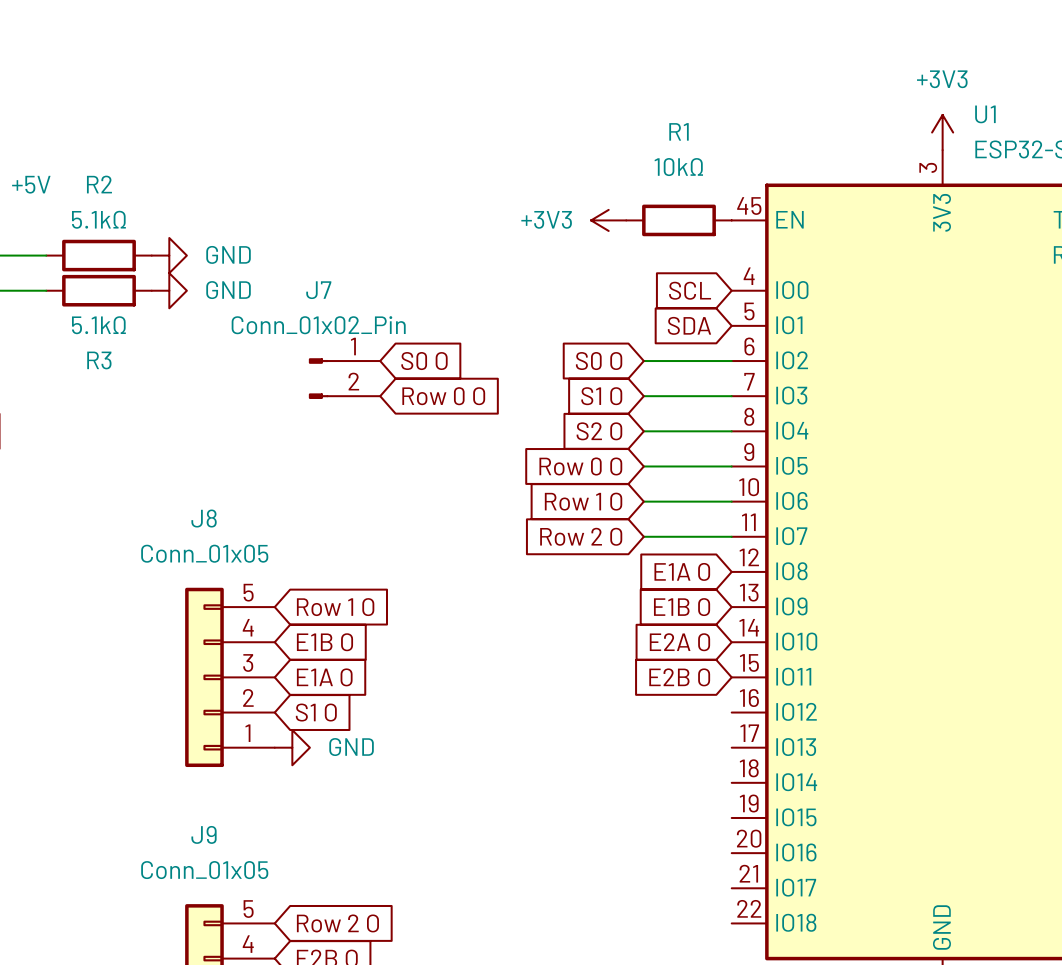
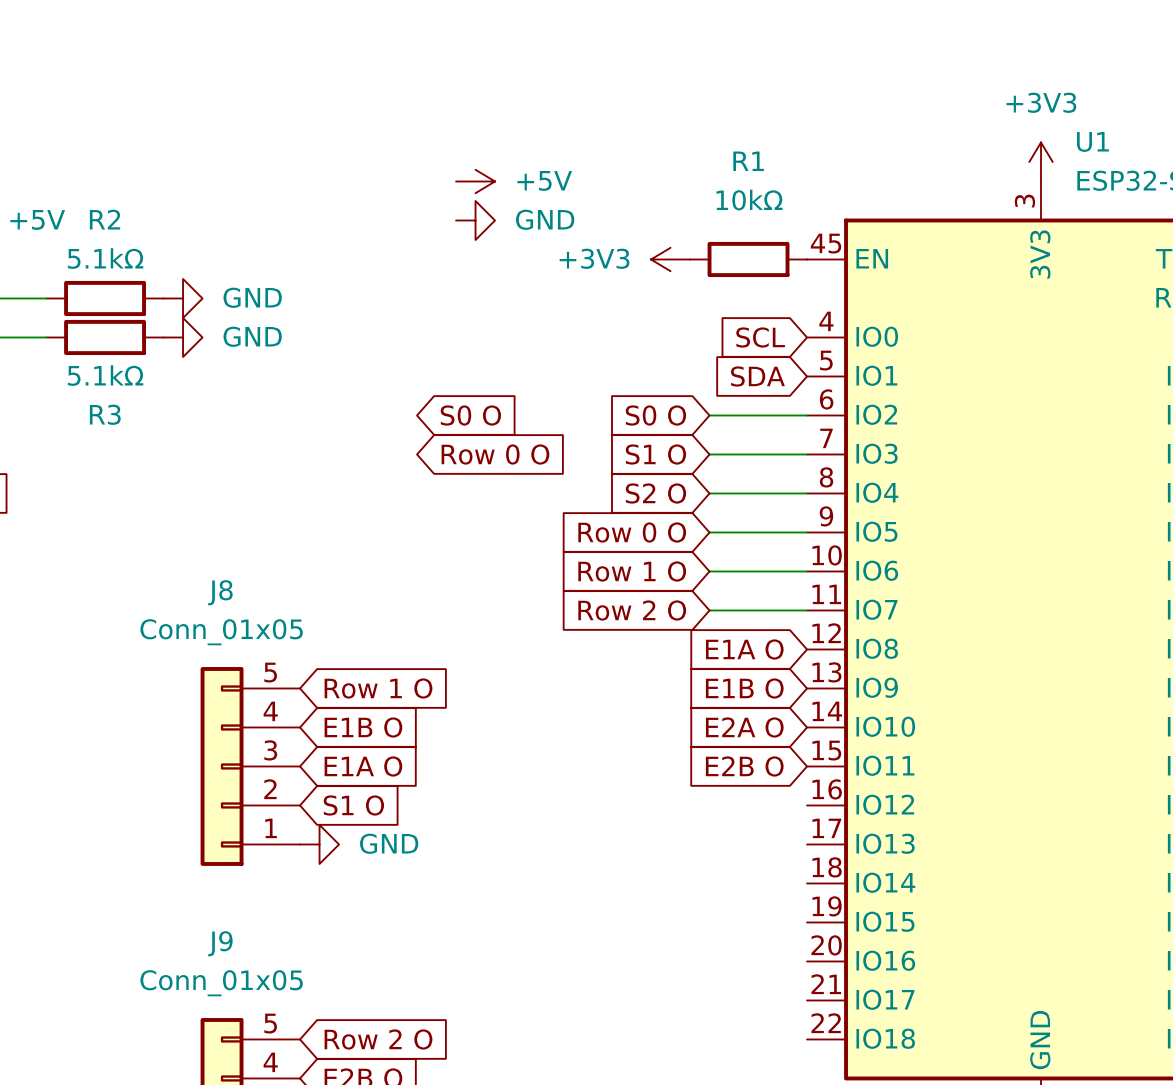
power symbol: none -> +5V (475, 181)
power symbol: none -> GND (475, 220)
J7: Conn_01x02_Pin (344, 378) -> none

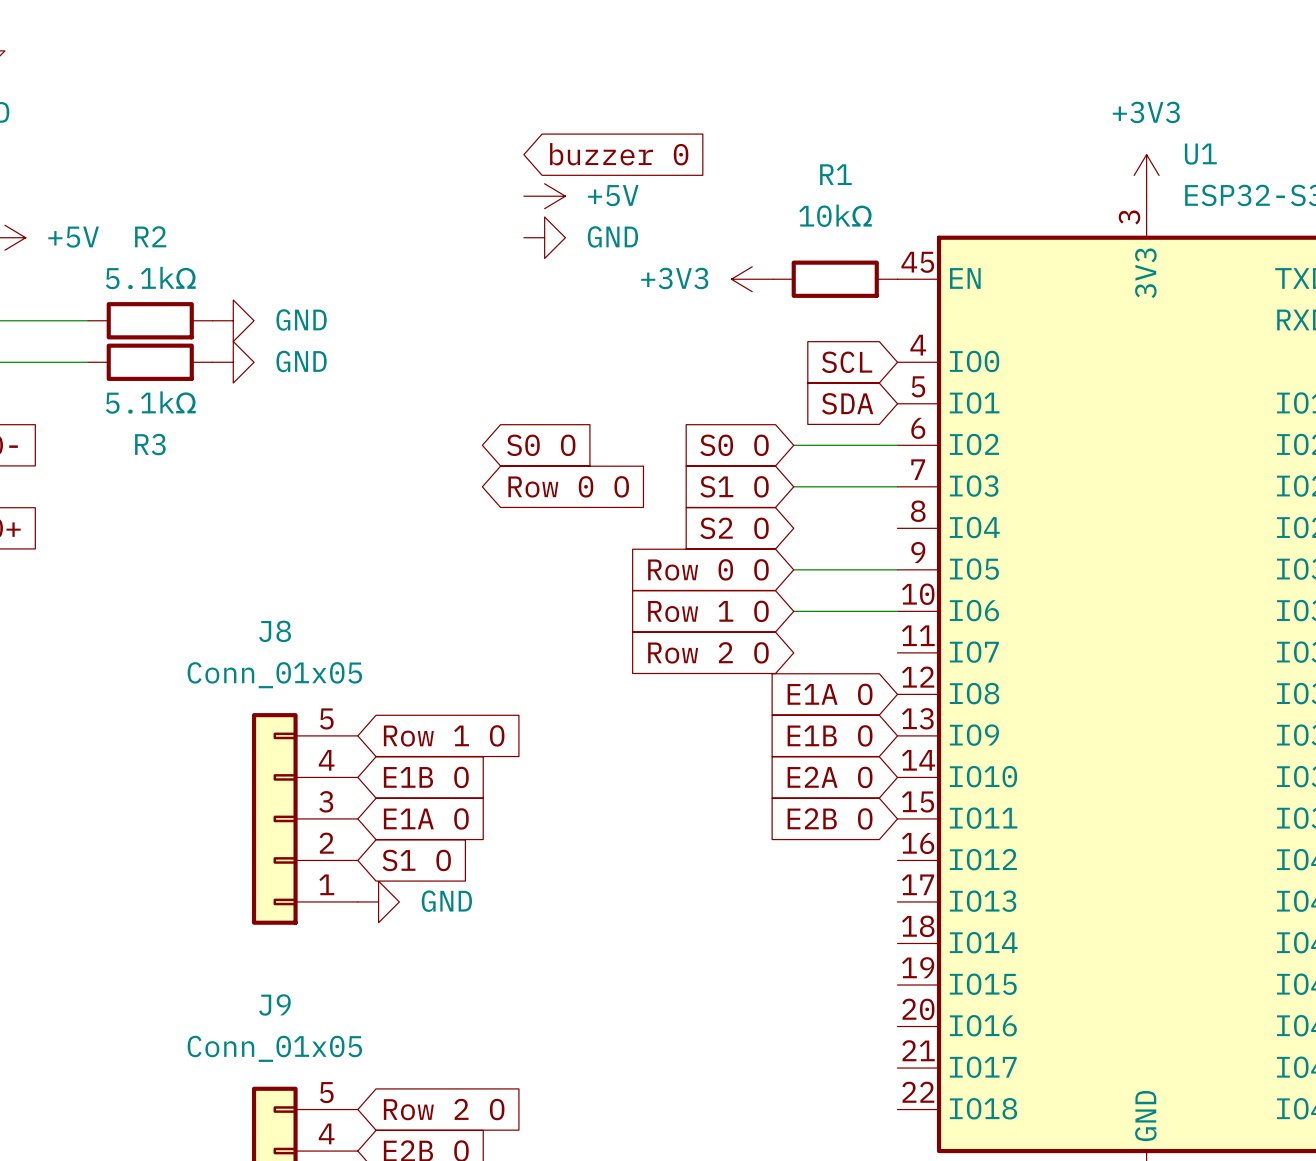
global label: none -> buzzer 0 (619, 154)
wire: (709, 493) (807, 493) -> none
wire: (709, 610) (807, 610) -> none

